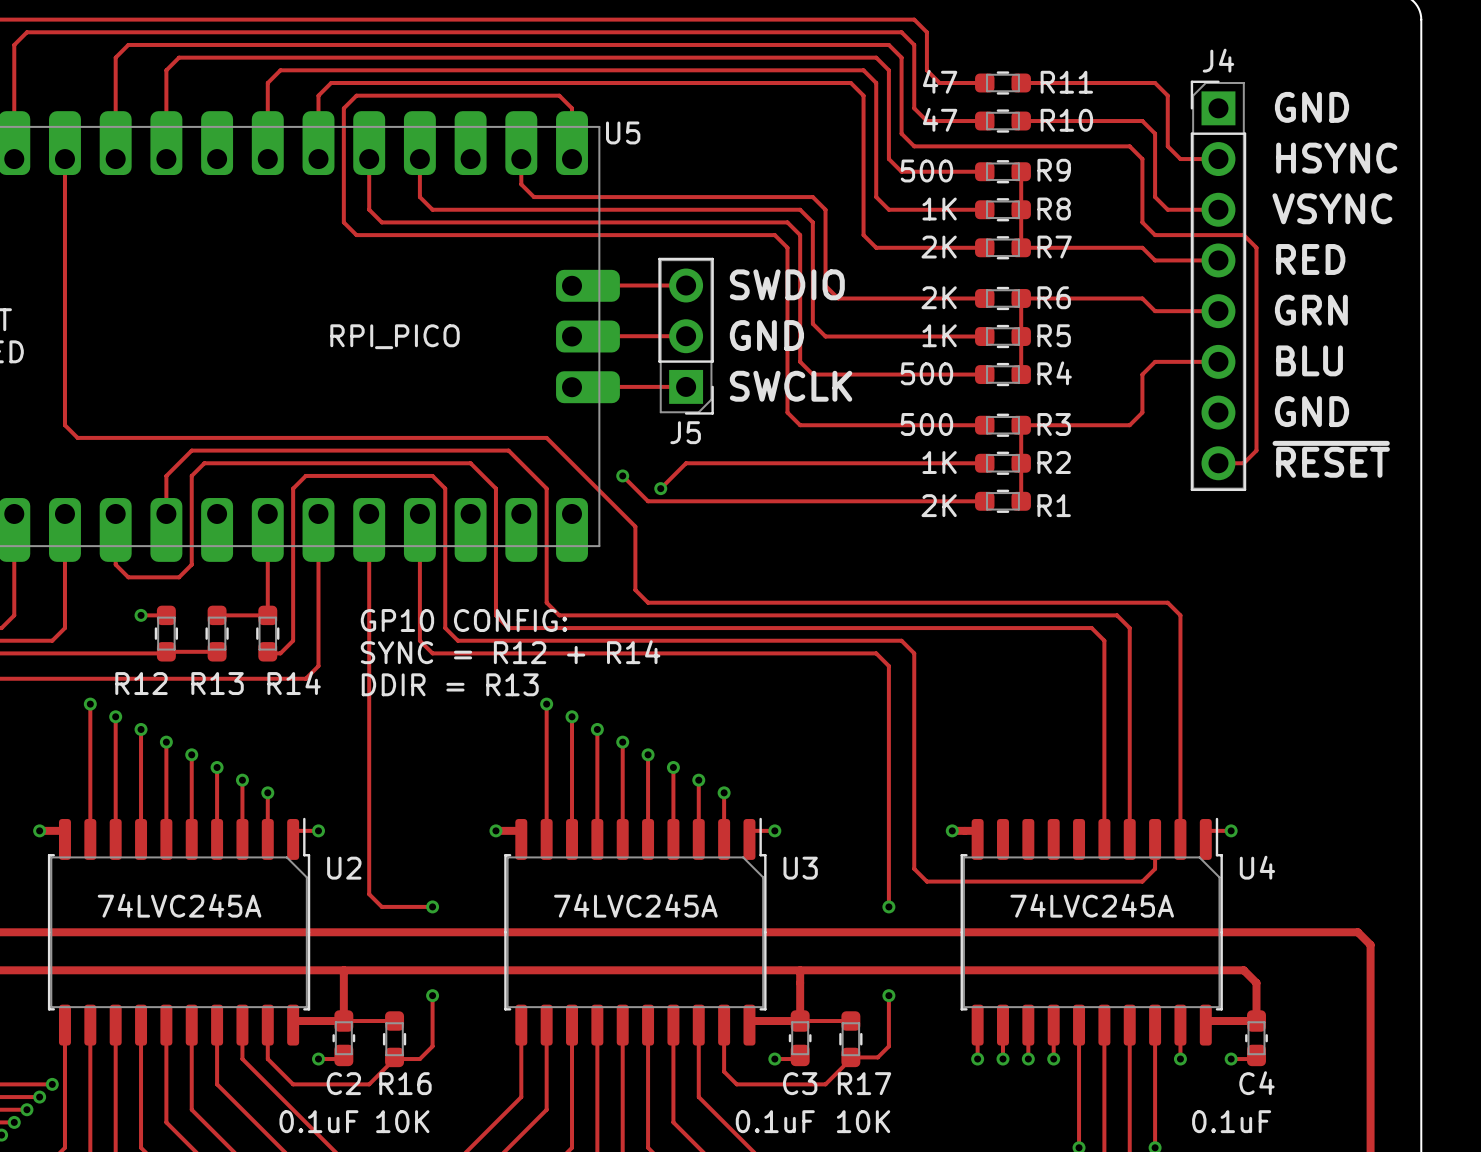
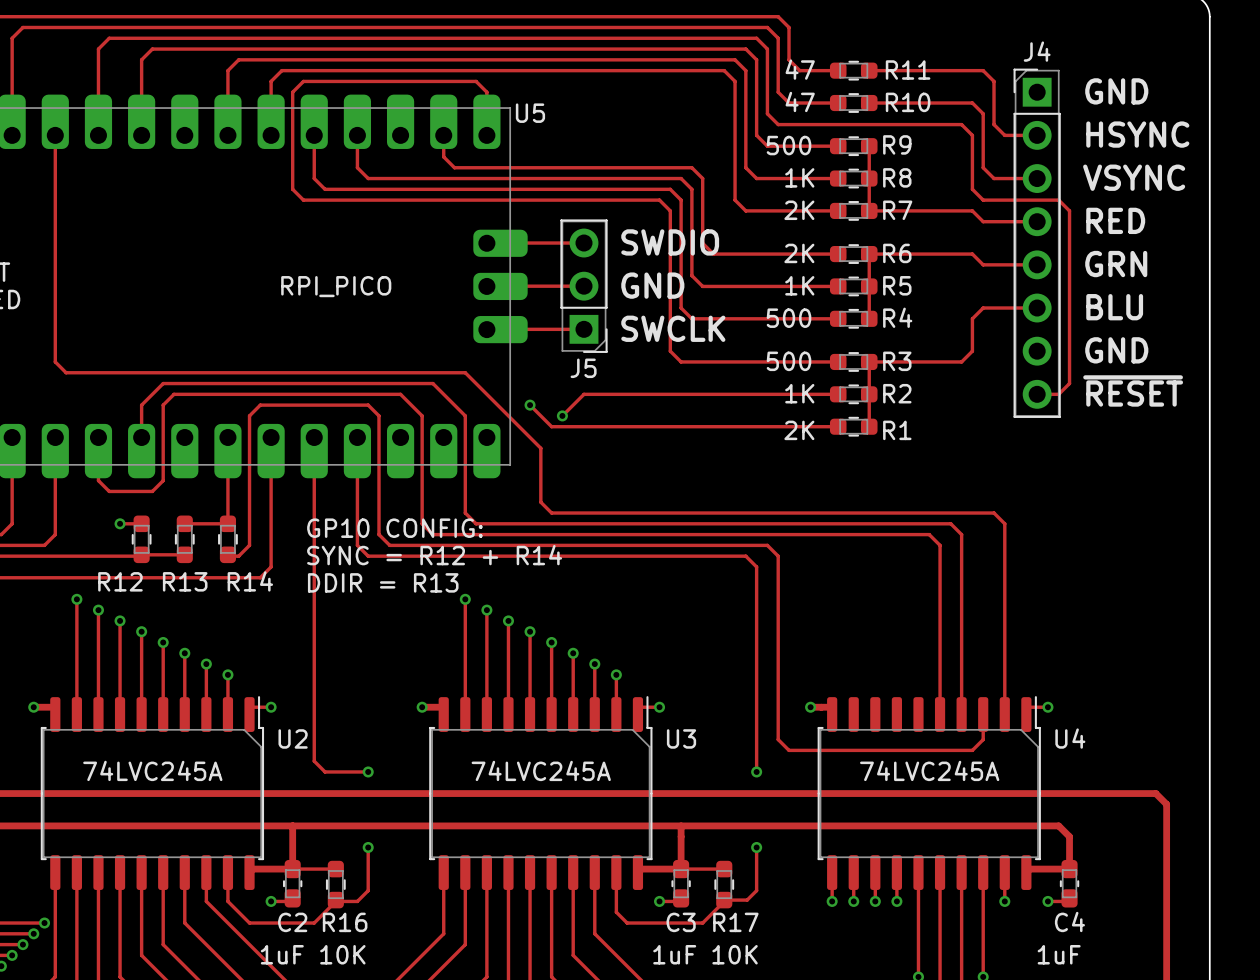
C2 value: 0.1uF (318, 1121) -> 1uF (282, 954)
C3 value: 0.1uF (775, 1121) -> 1uF (674, 954)
C4 value: 0.1uF (1231, 1121) -> 1uF (1059, 954)

